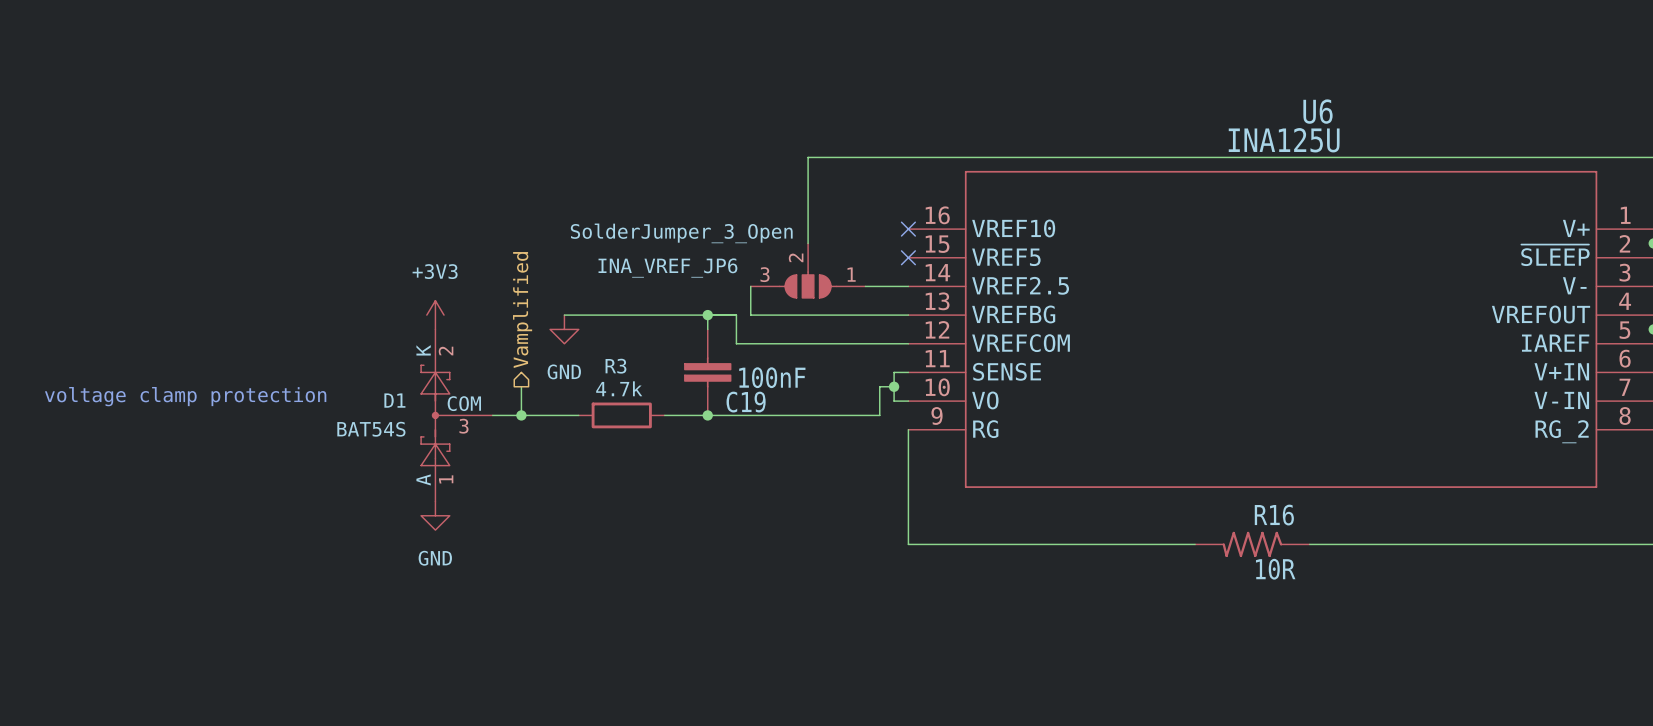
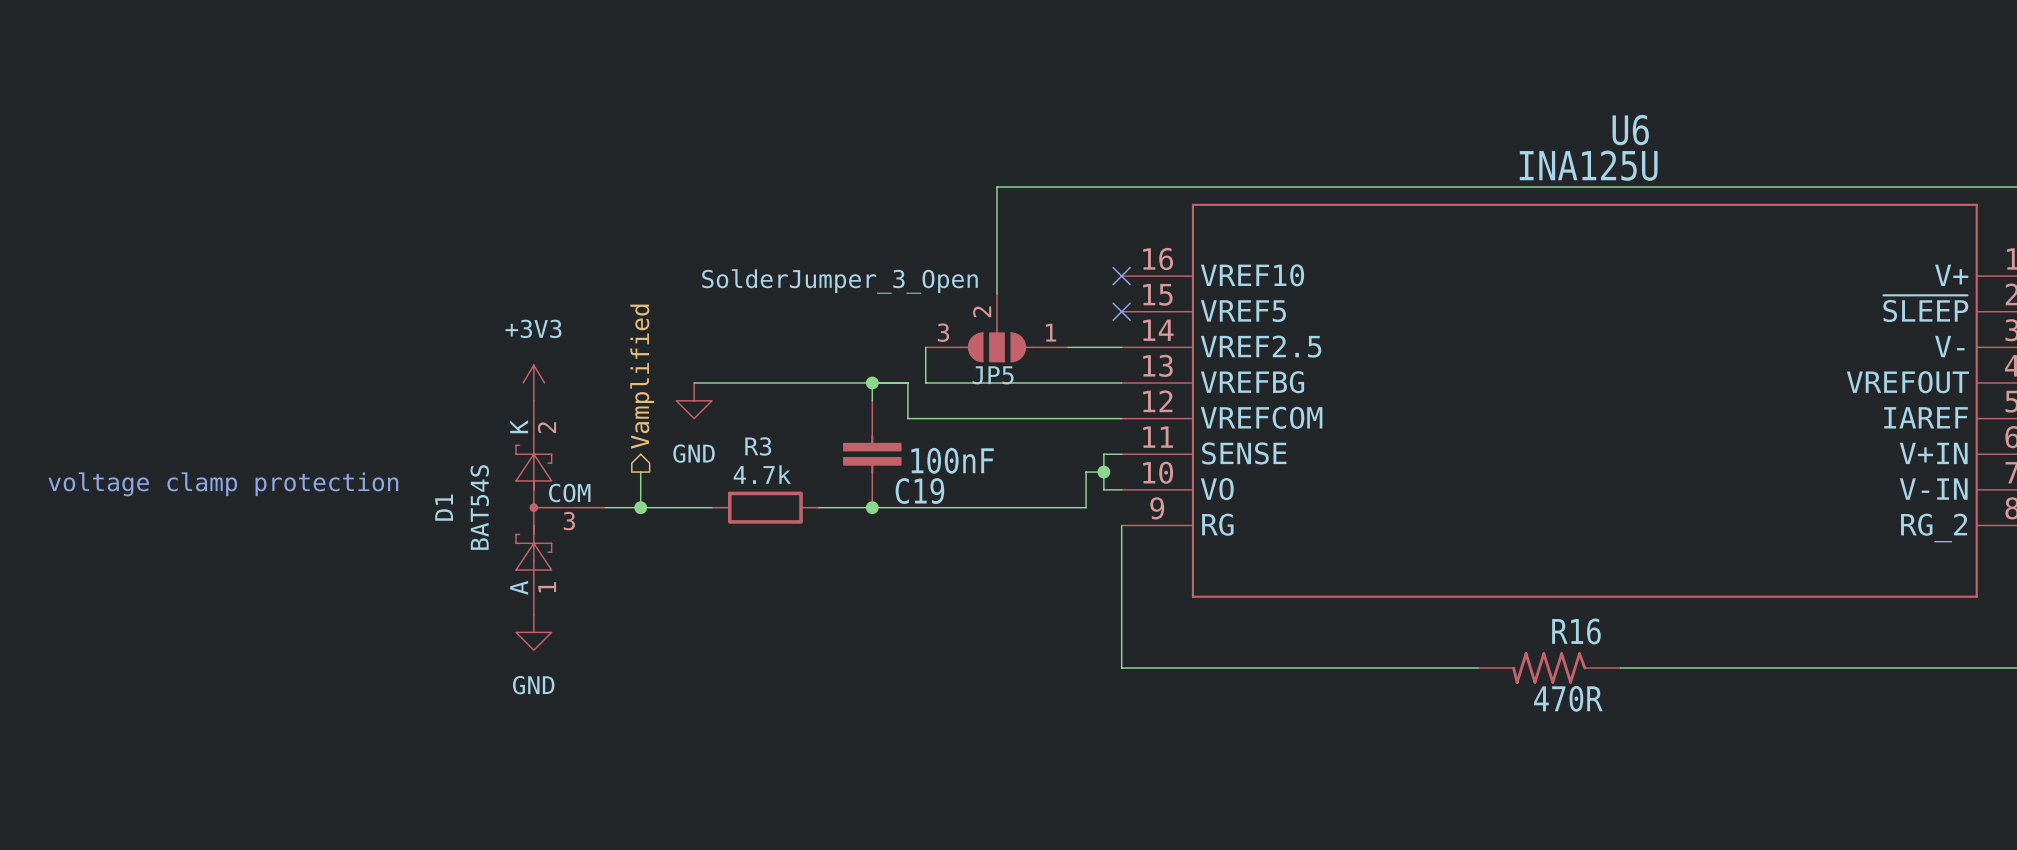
INA_VREF_JP6 name: INA_VREF_JP6 (667, 268) -> JP5 (993, 375)
D1 name rotation: 0° (394, 400) -> 90° counterclockwise (444, 507)
D1 value rotation: 0° (371, 429) -> 90° counterclockwise (479, 507)
R16 value: 10R (1275, 569) -> 470R (1568, 698)

